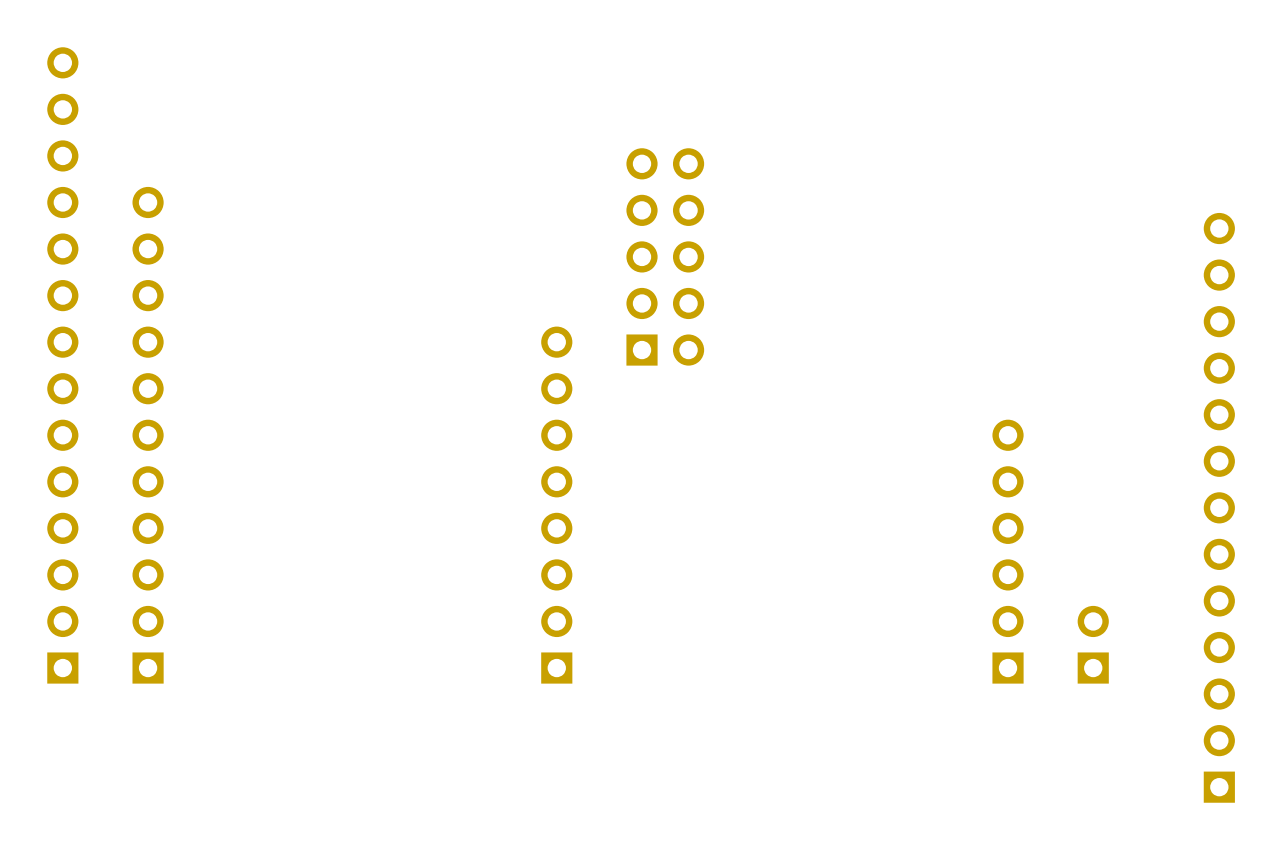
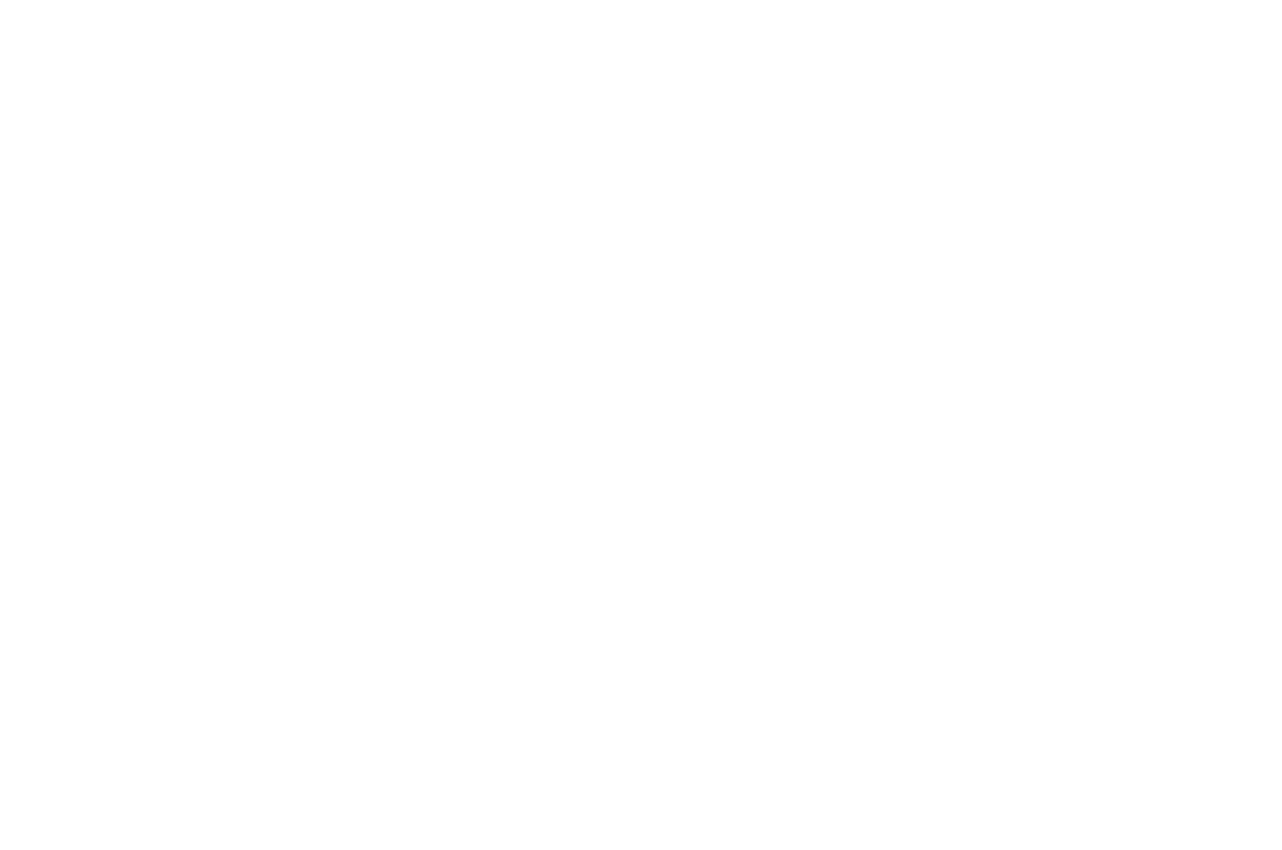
part: (665, 256) -> none
part: (62, 365) -> none
part: (148, 435) -> none
part: (556, 505) -> none
part: (1219, 507) -> none
part: (1008, 551) -> none
part: (1093, 644) -> none

